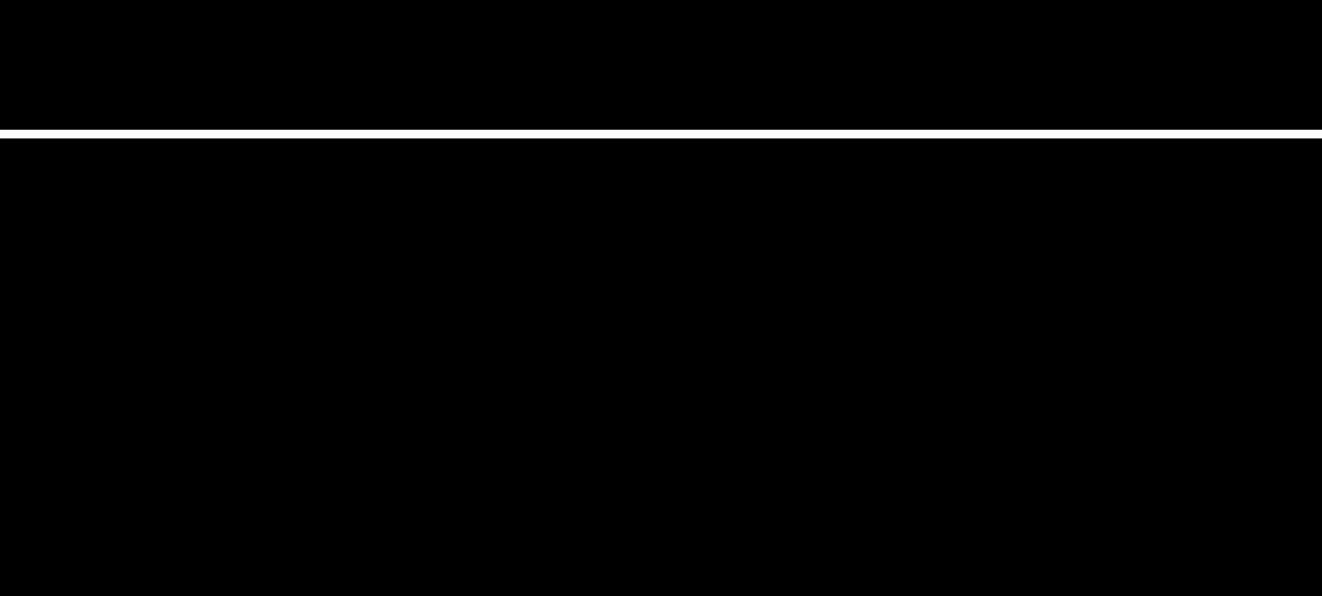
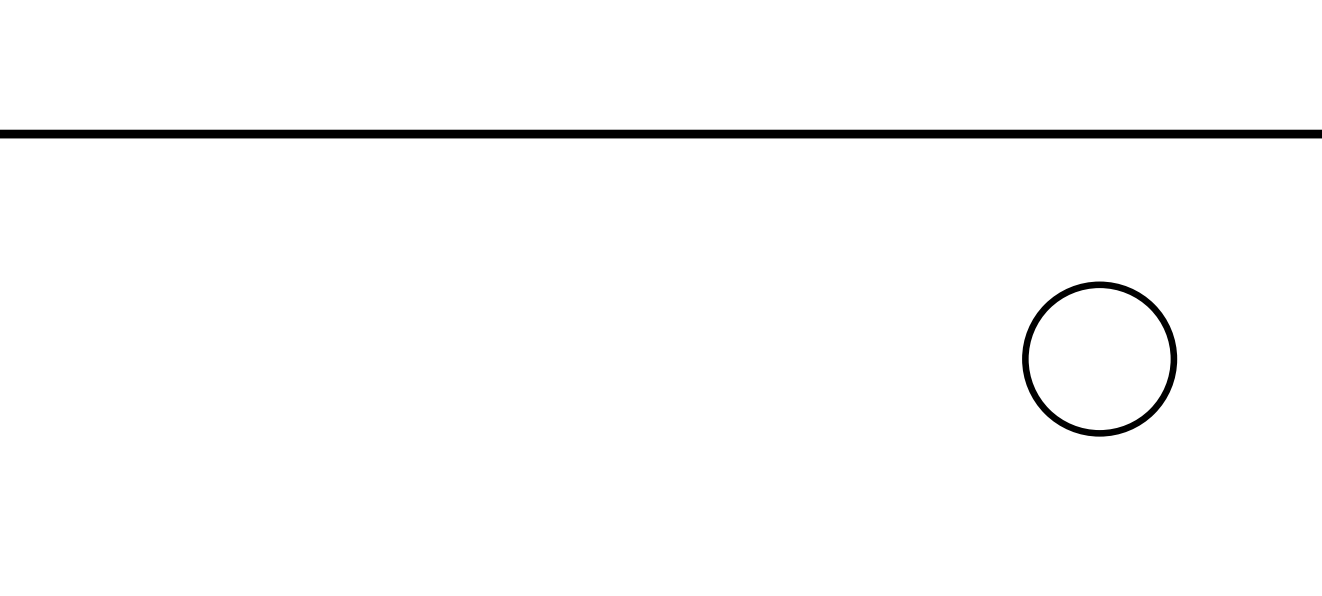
round board edge: none -> [1022, 281, 1178, 437]

